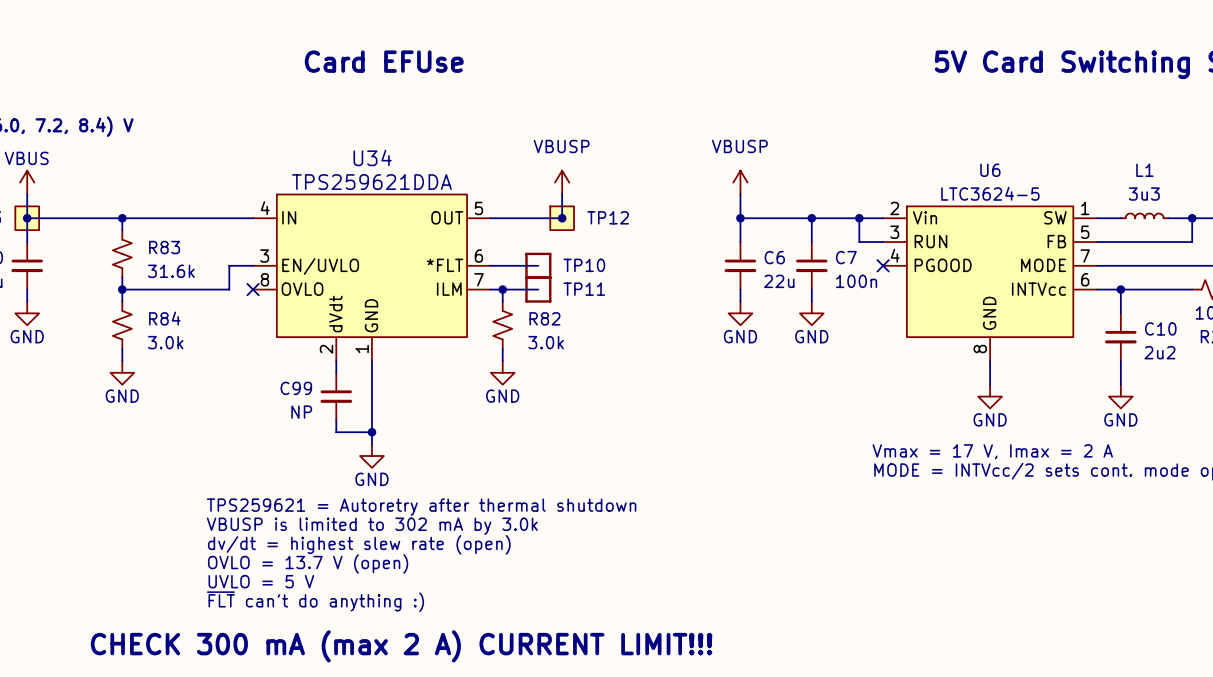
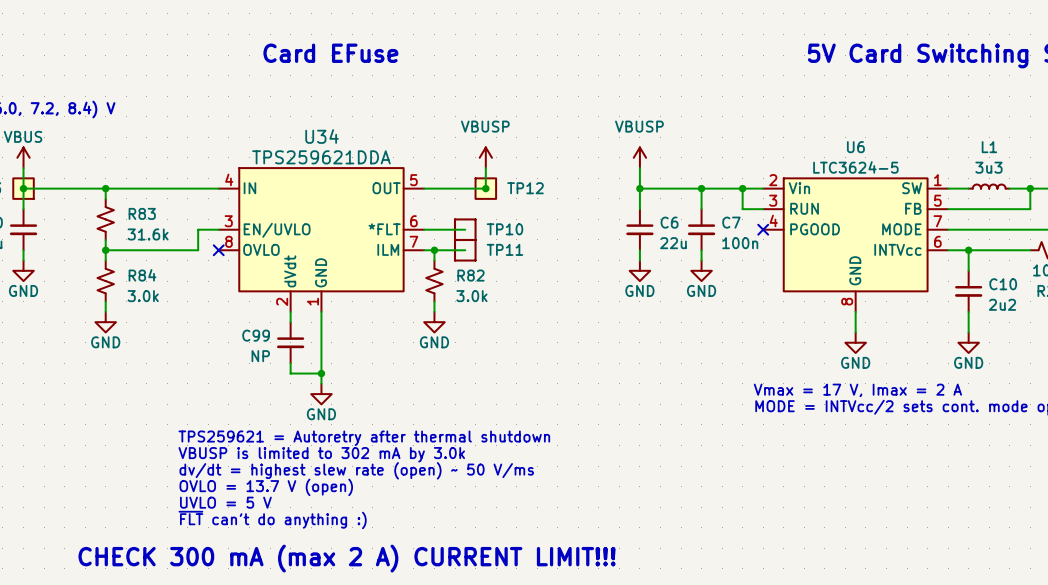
text: Card EFUse (384, 61) -> Card EFuse (330, 53)
text: dv/dt = highest slew rate (open) (359, 544) -> dv/dt = highest slew rate (open) ~ 50 V/ms (356, 470)

